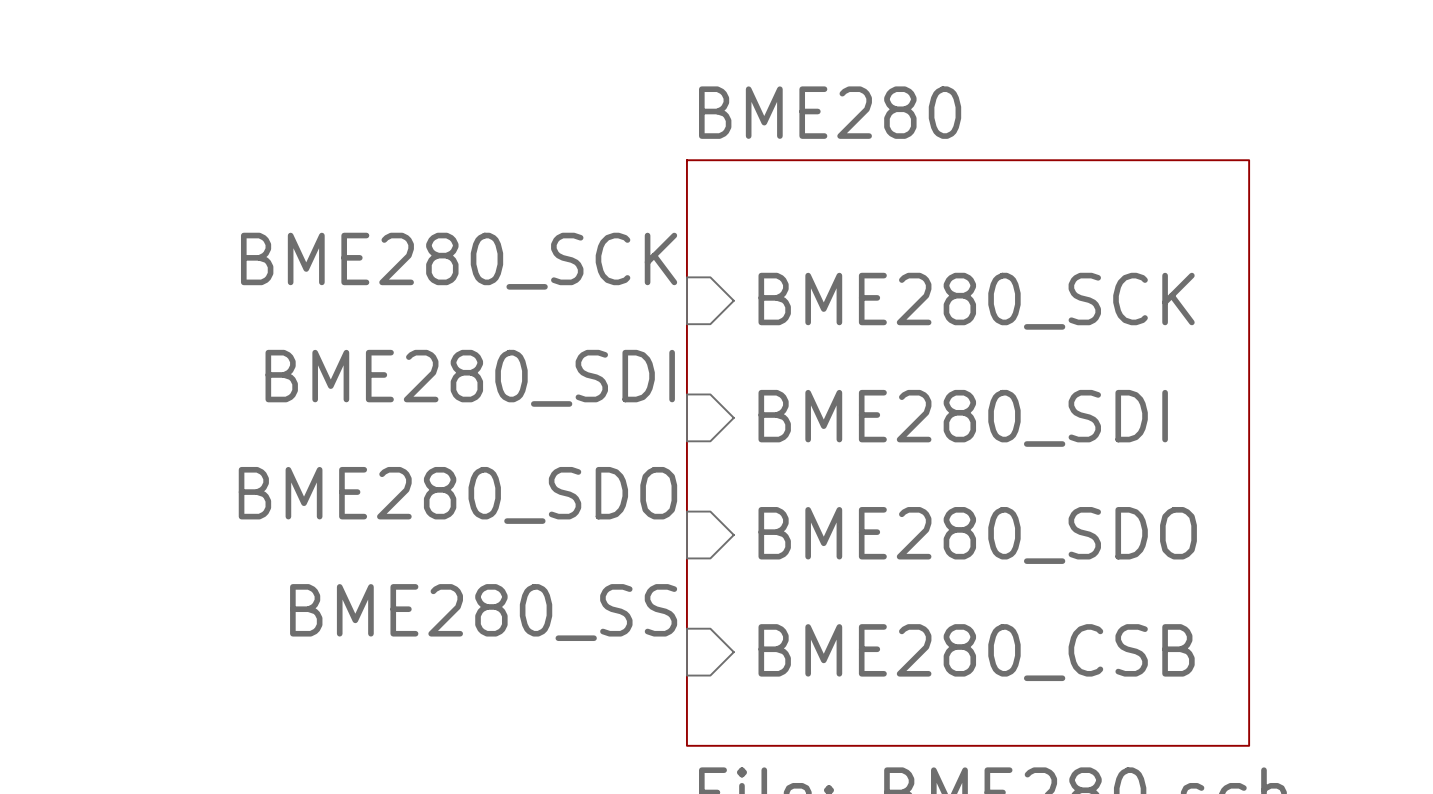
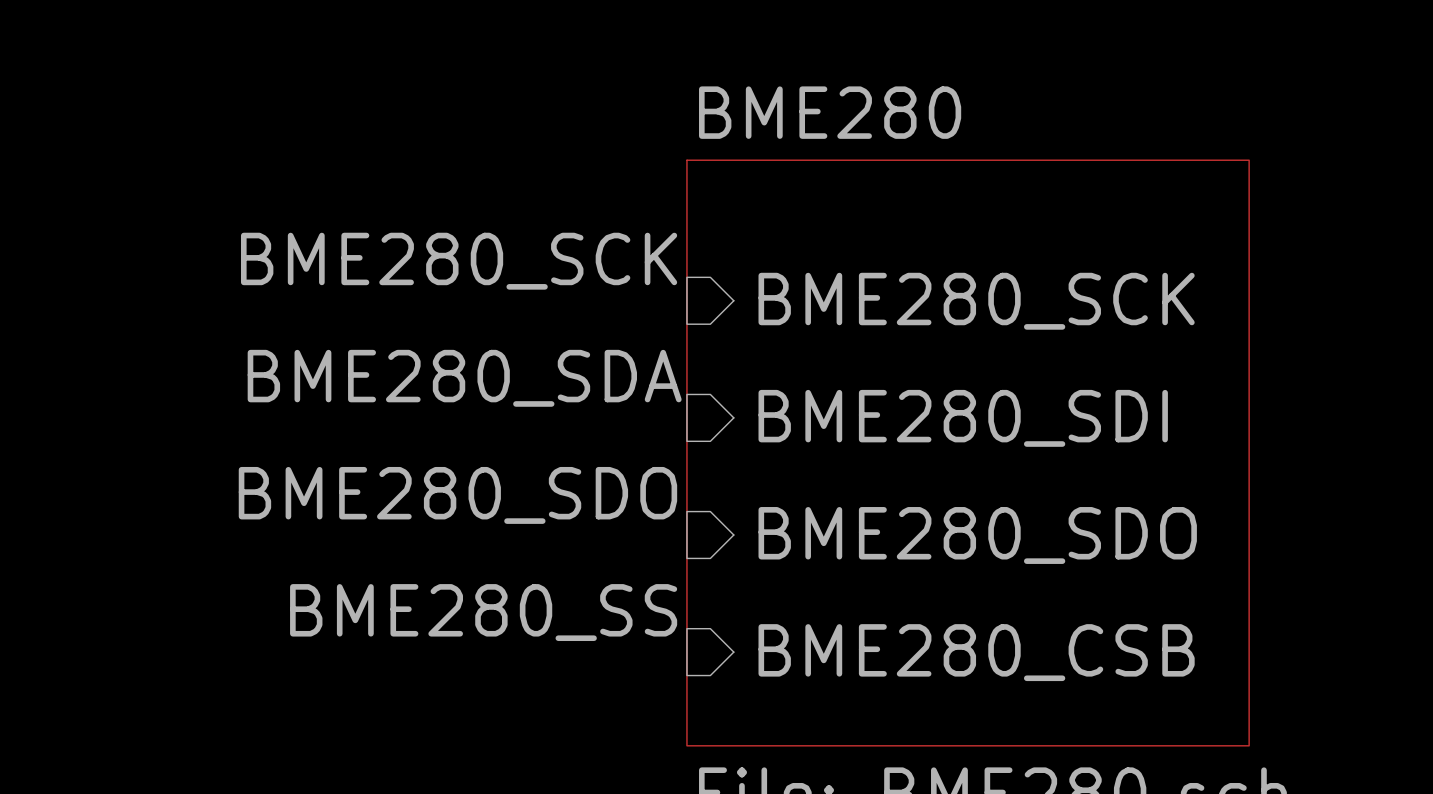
label: BME280_SDI (470, 378) -> BME280_SDA (464, 378)

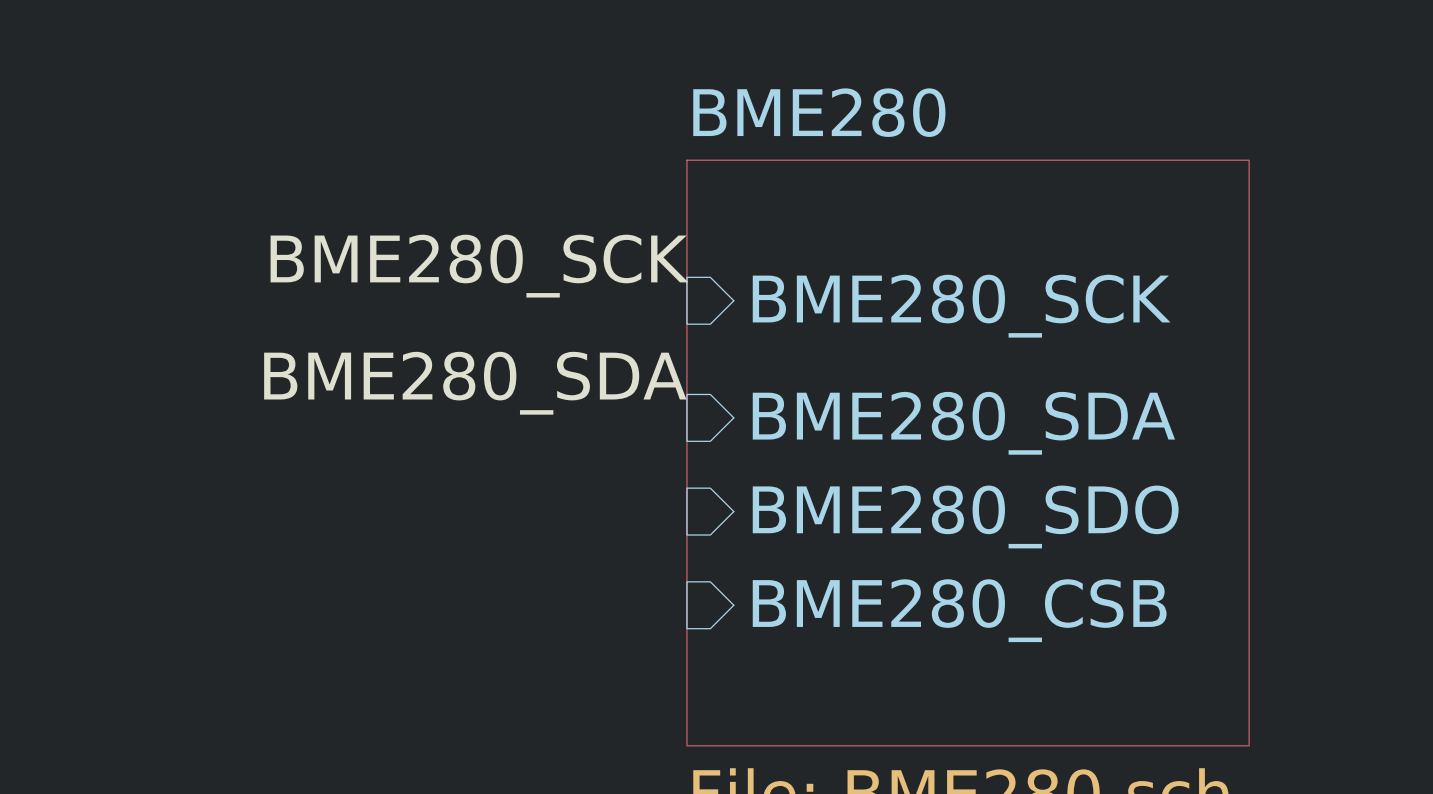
sheet pin: BME280_SDI (963, 418) -> BME280_SDA (963, 423)
label: BME280_SDO (457, 495) -> none
sheet pin position: BME280_SDO (977, 535) -> BME280_SDO (965, 516)
label: BME280_SS (483, 612) -> none
sheet pin position: BME280_CSB (976, 652) -> BME280_CSB (959, 610)

